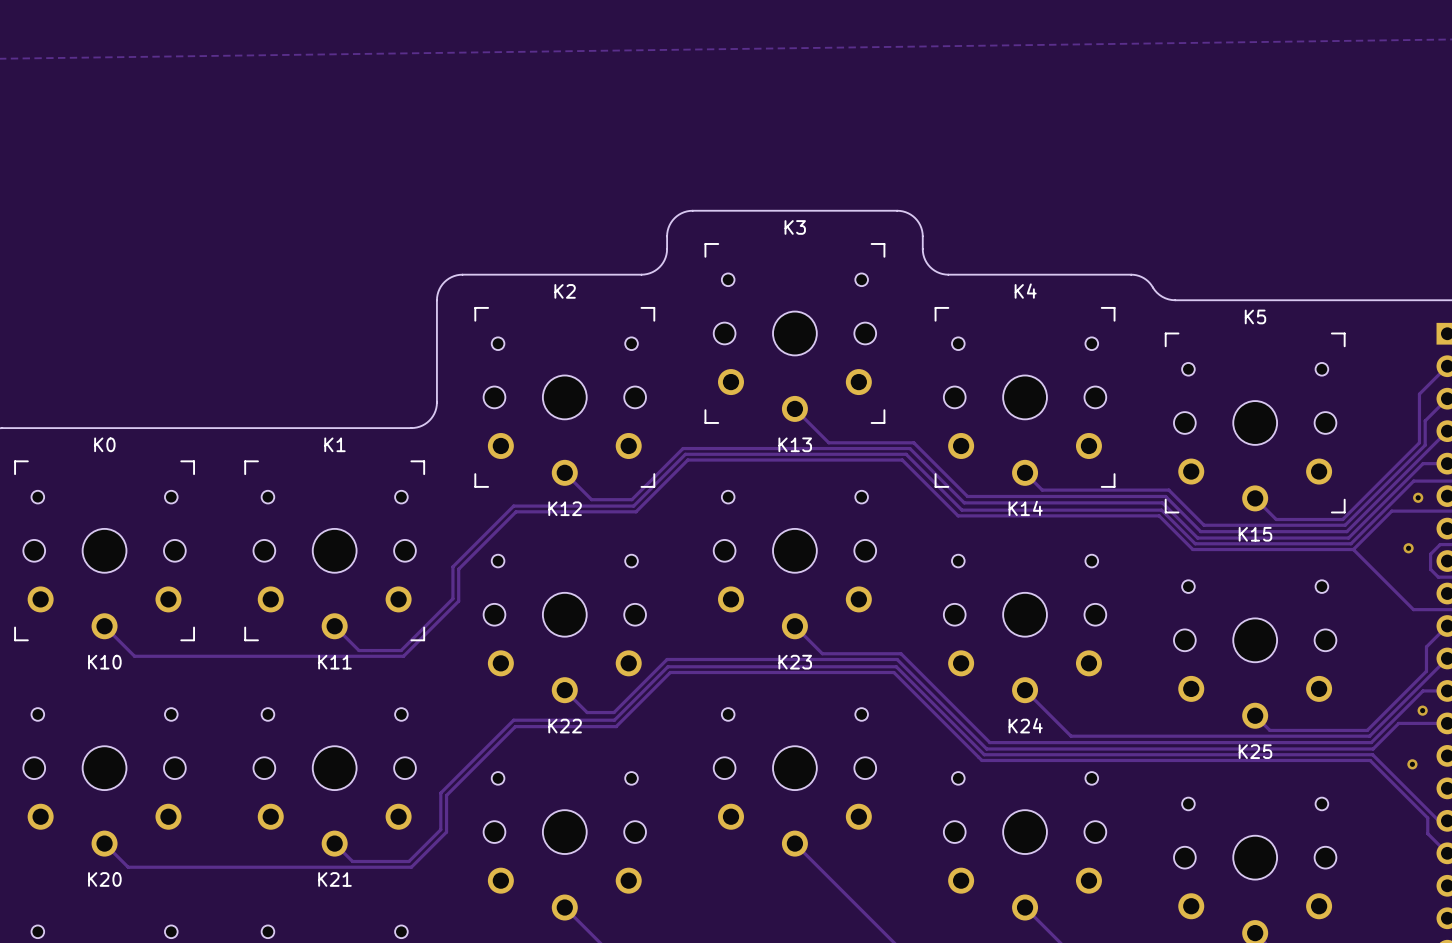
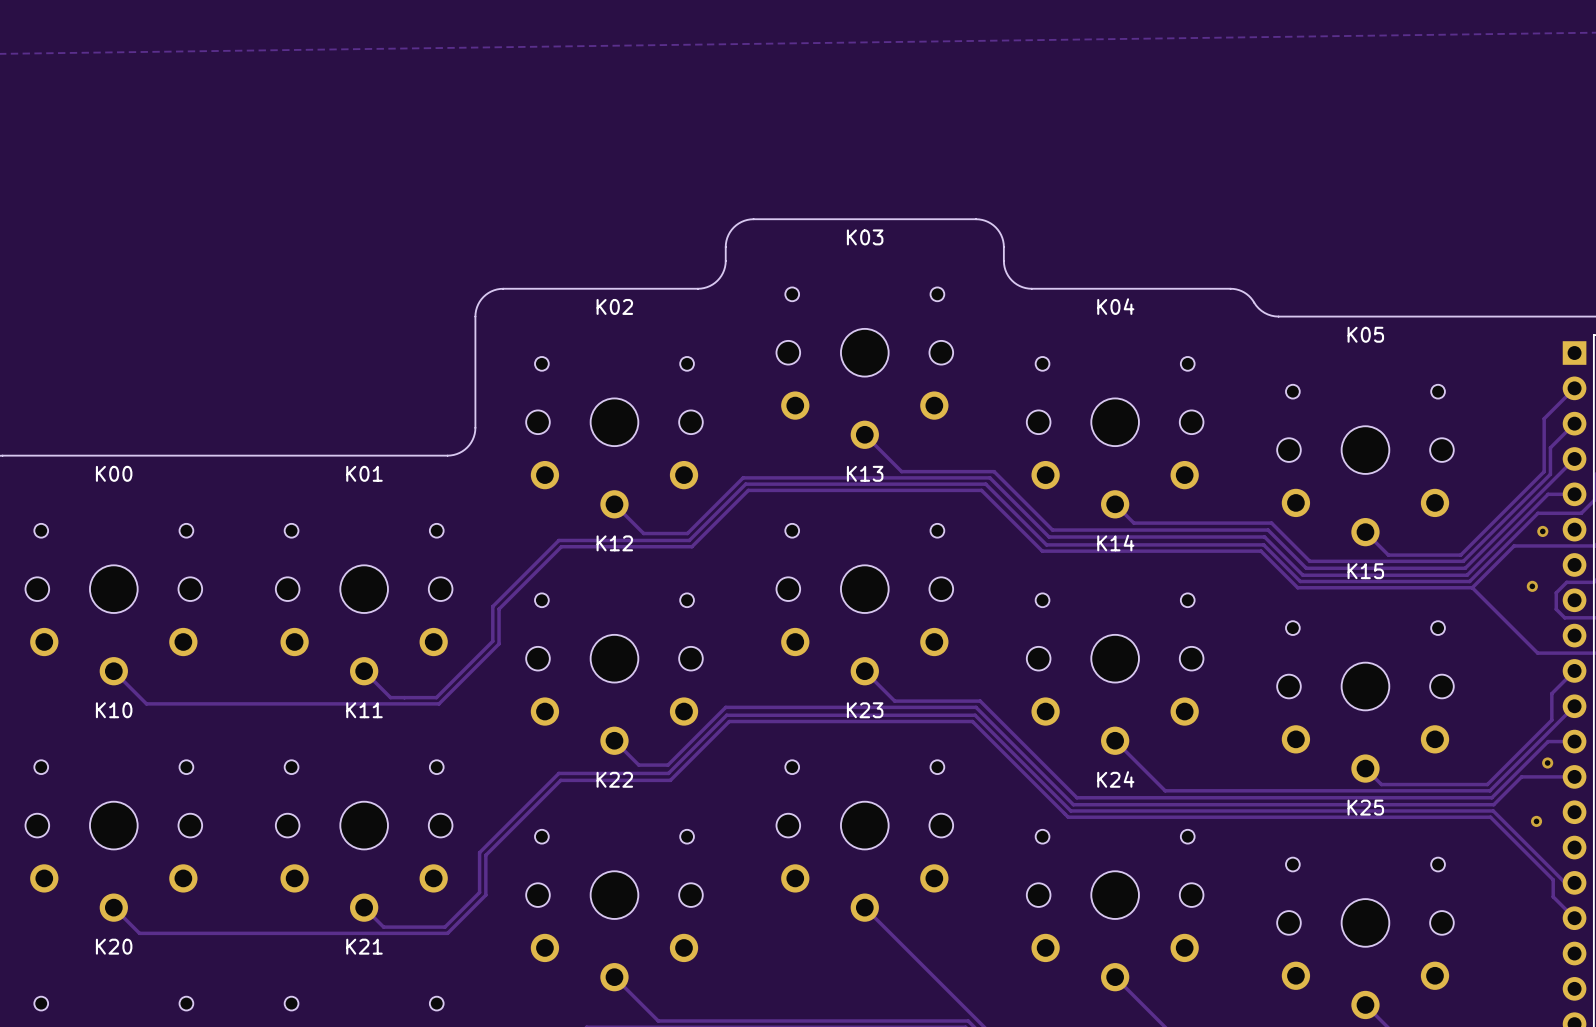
K3: (794, 333) -> none
K03: none -> (864, 368)
K2: (564, 397) -> none
K4: (1025, 397) -> none
K02: none -> (614, 437)
K04: none -> (1115, 437)
K5: (1255, 422) -> none
K05: none -> (1365, 465)
K0: (104, 550) -> none
K1: (334, 550) -> none
K00: none -> (113, 604)
K01: none -> (364, 604)

